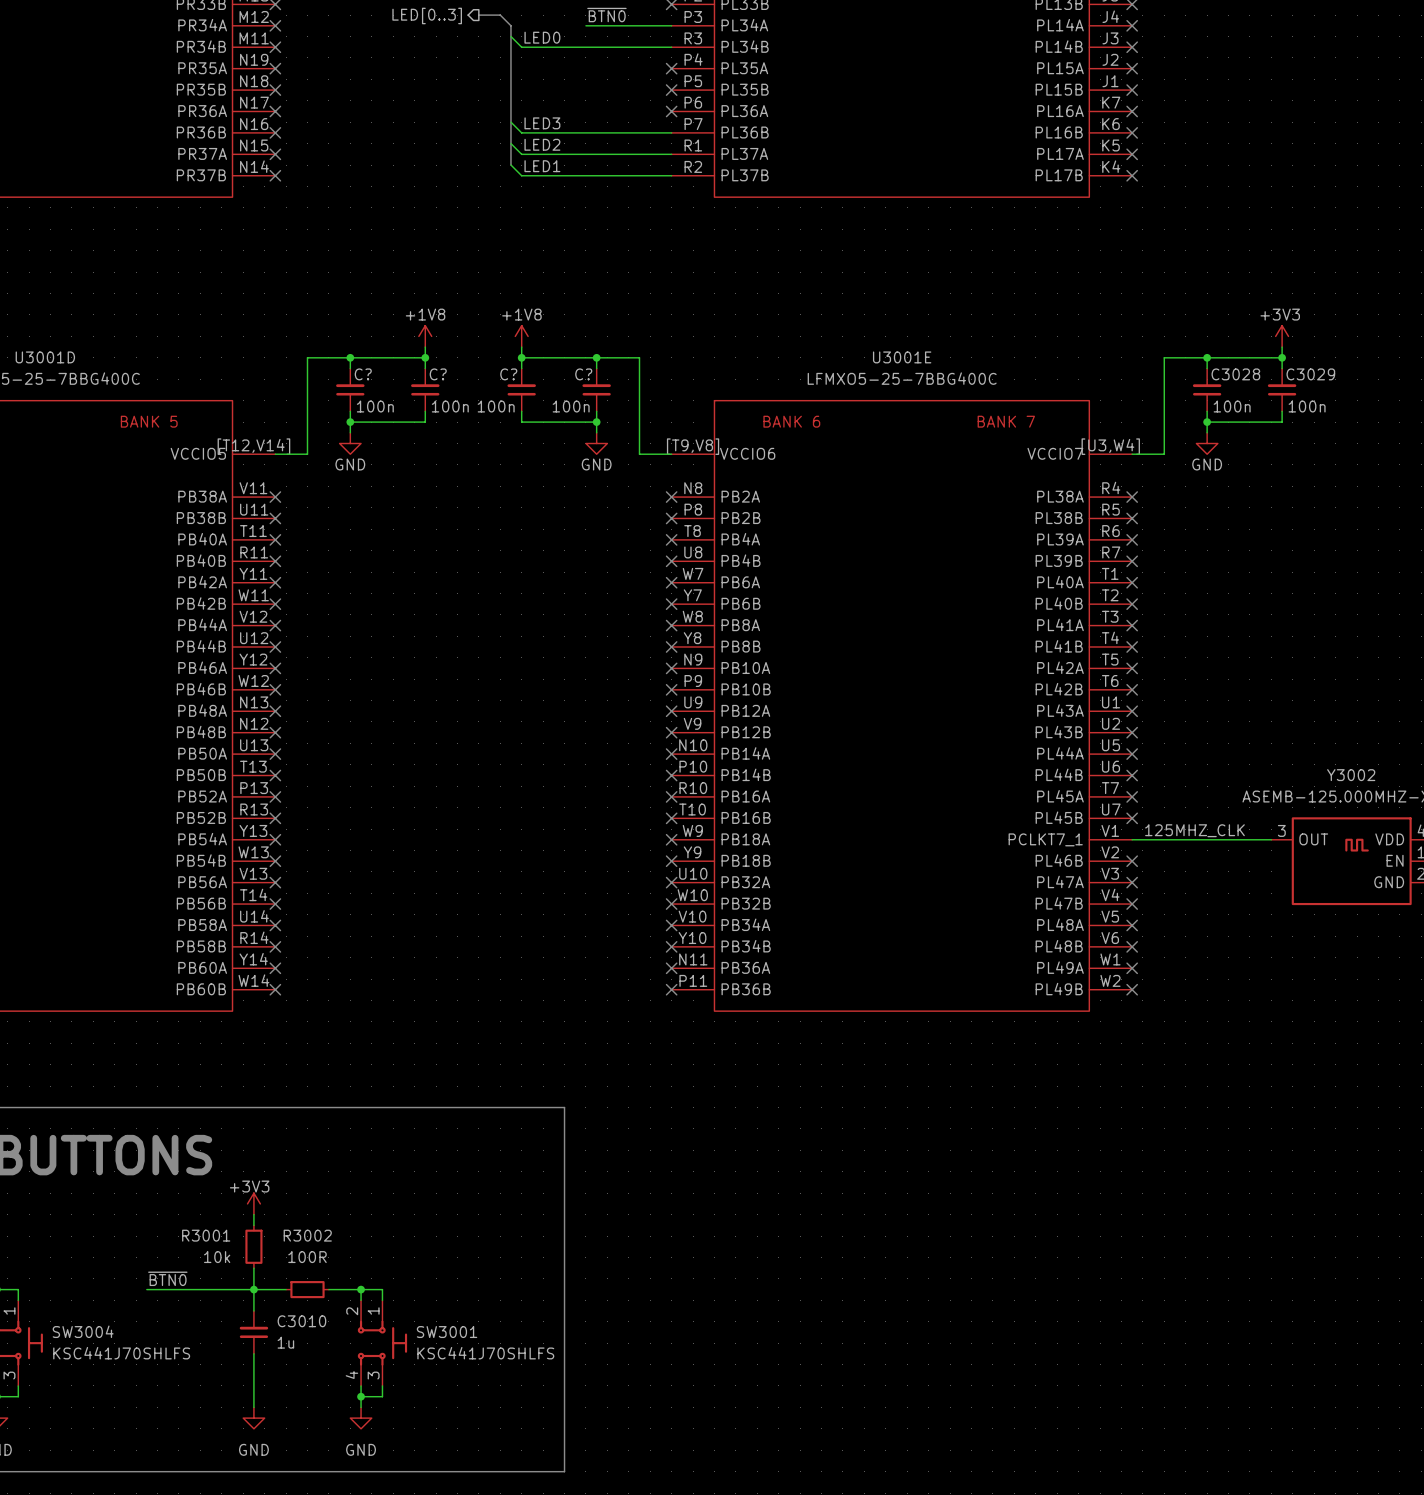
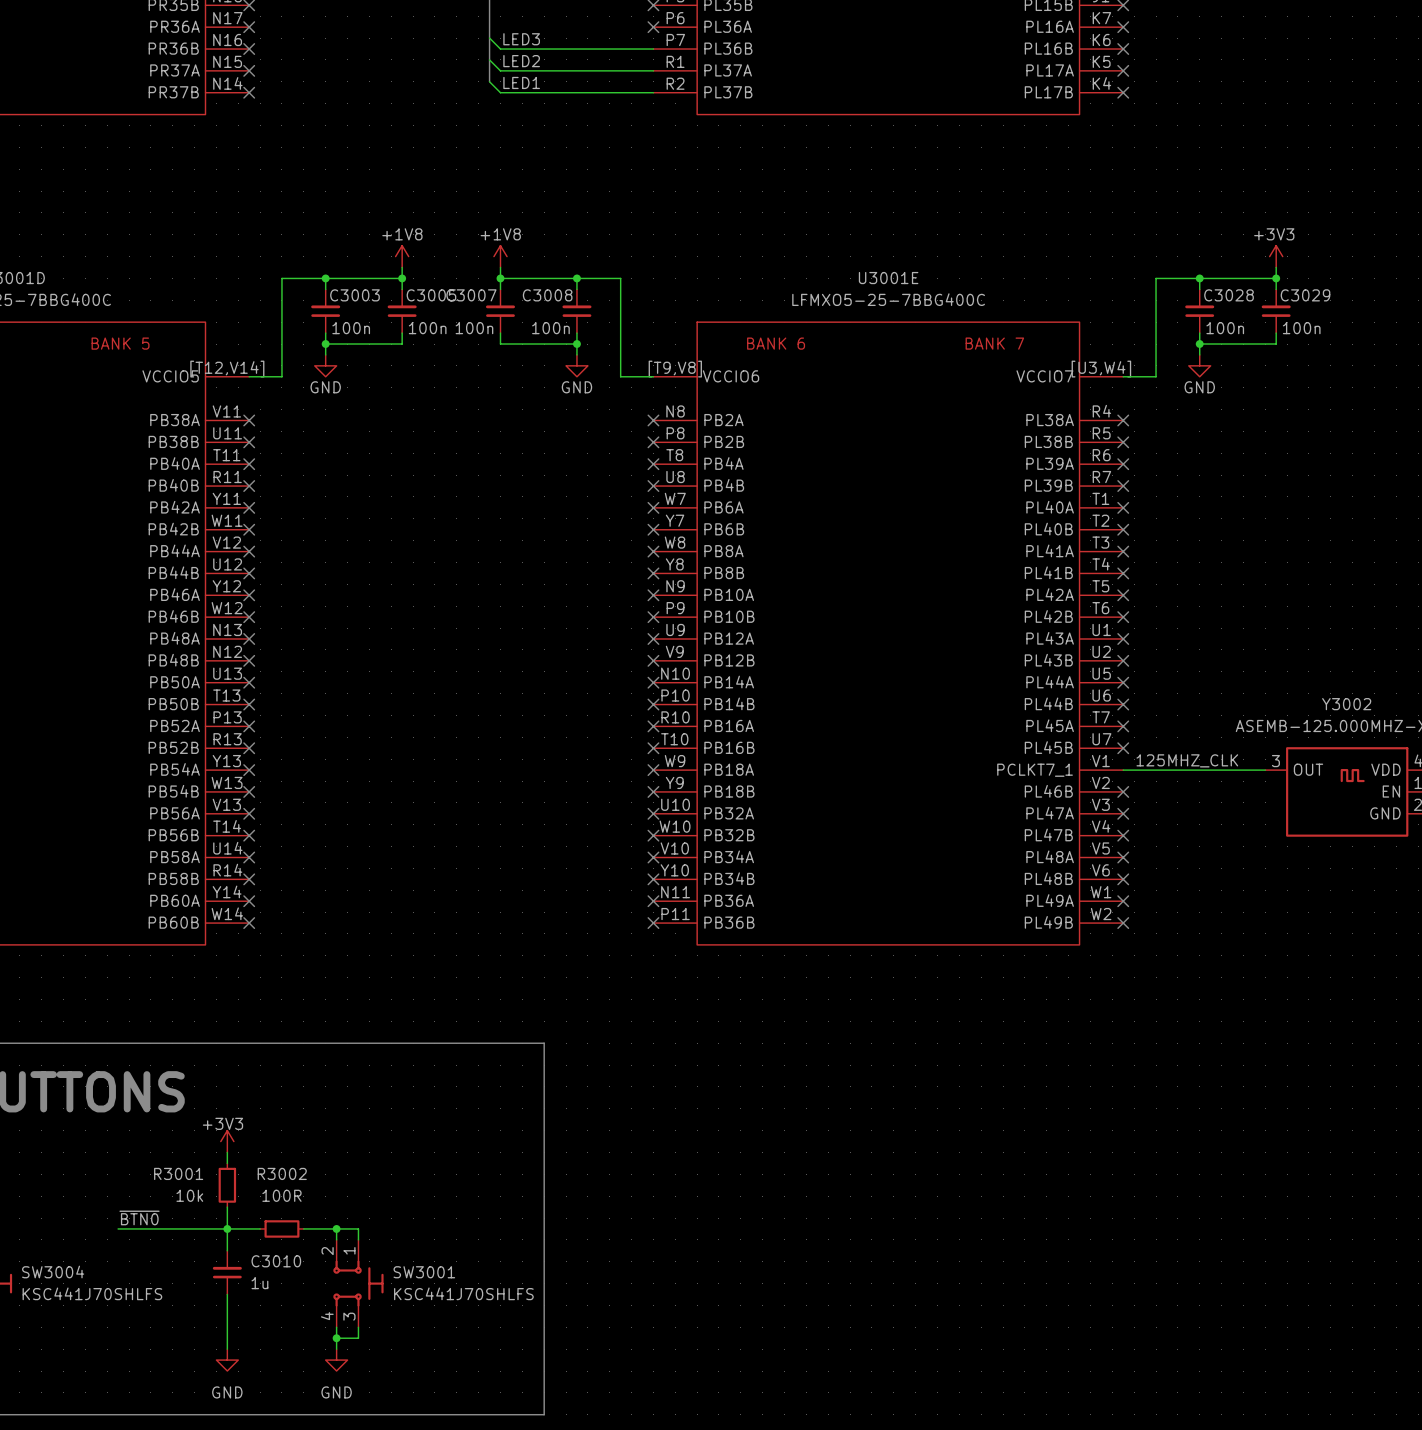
C? name: C? (363, 374) -> C3003 (354, 295)
C? name: C? (438, 374) -> C3005 (431, 295)
C? name: C? (508, 374) -> C3007 (471, 295)
C? name: C? (583, 374) -> C3008 (547, 295)

